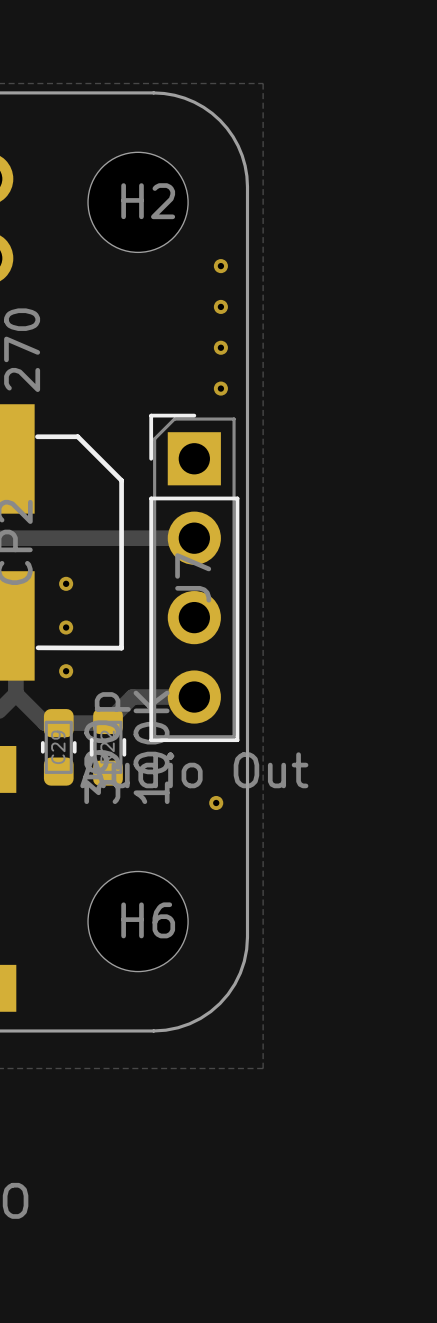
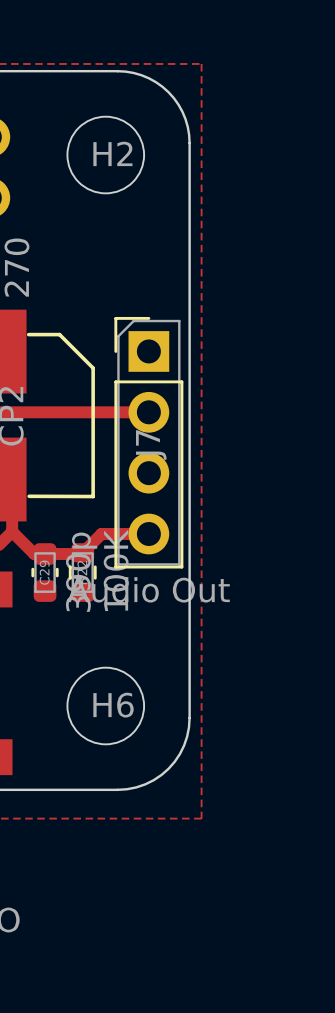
via: (220, 266) -> none
via: (220, 306) -> none
via: (220, 347) -> none
via: (220, 388) -> none
via: (66, 583) -> none
via: (66, 627) -> none
via: (66, 671) -> none
via: (216, 803) -> none

